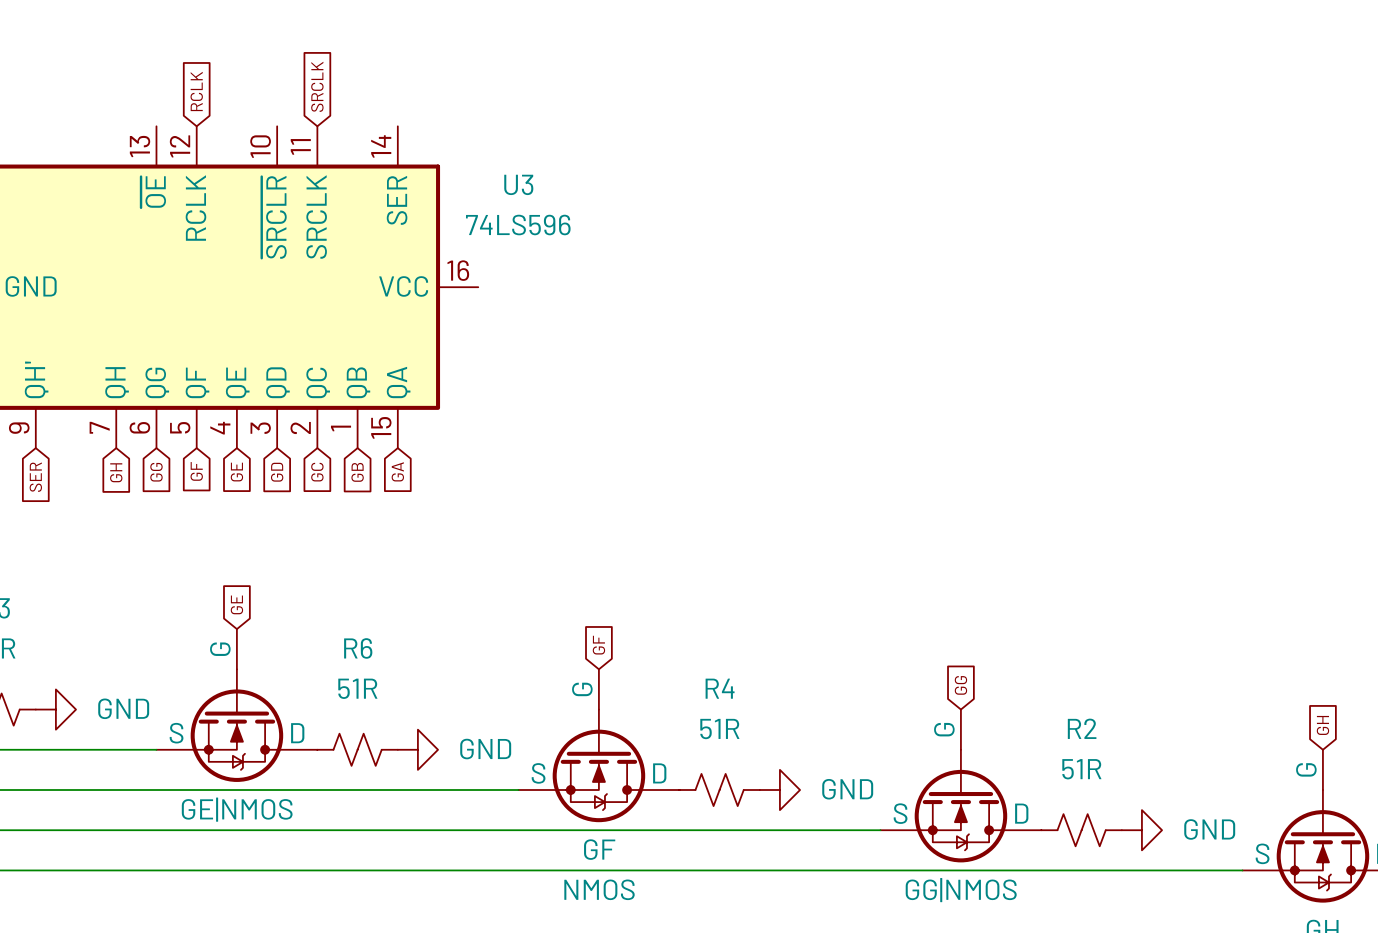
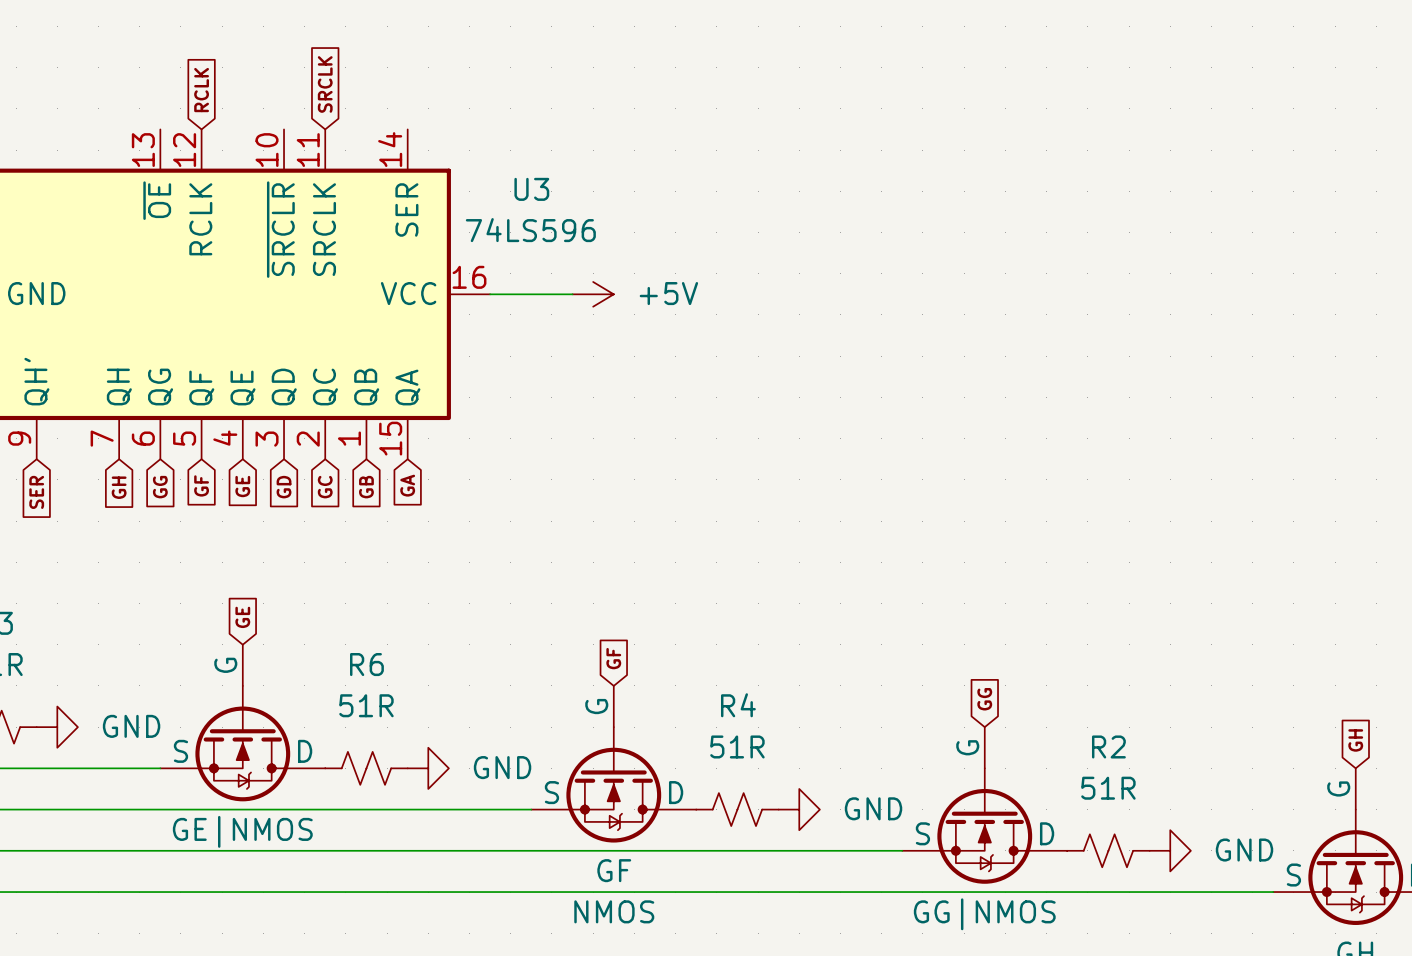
wire: none -> (490, 294) (572, 294)
power symbol: none -> +5V (593, 294)

